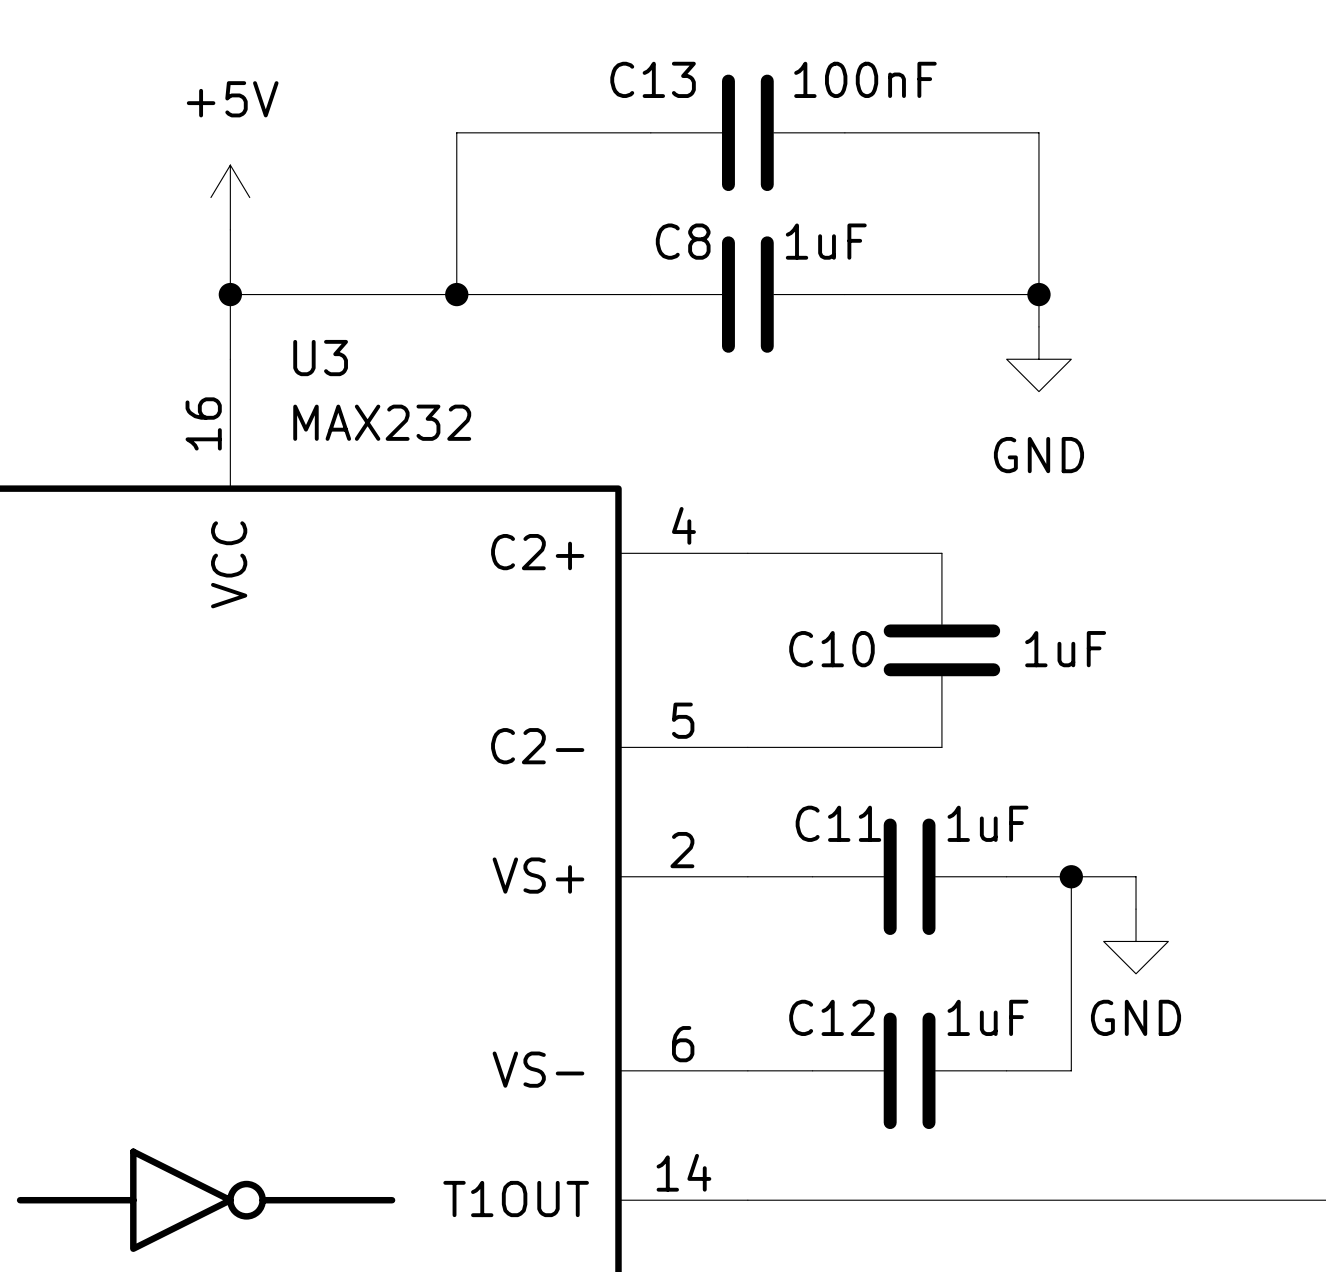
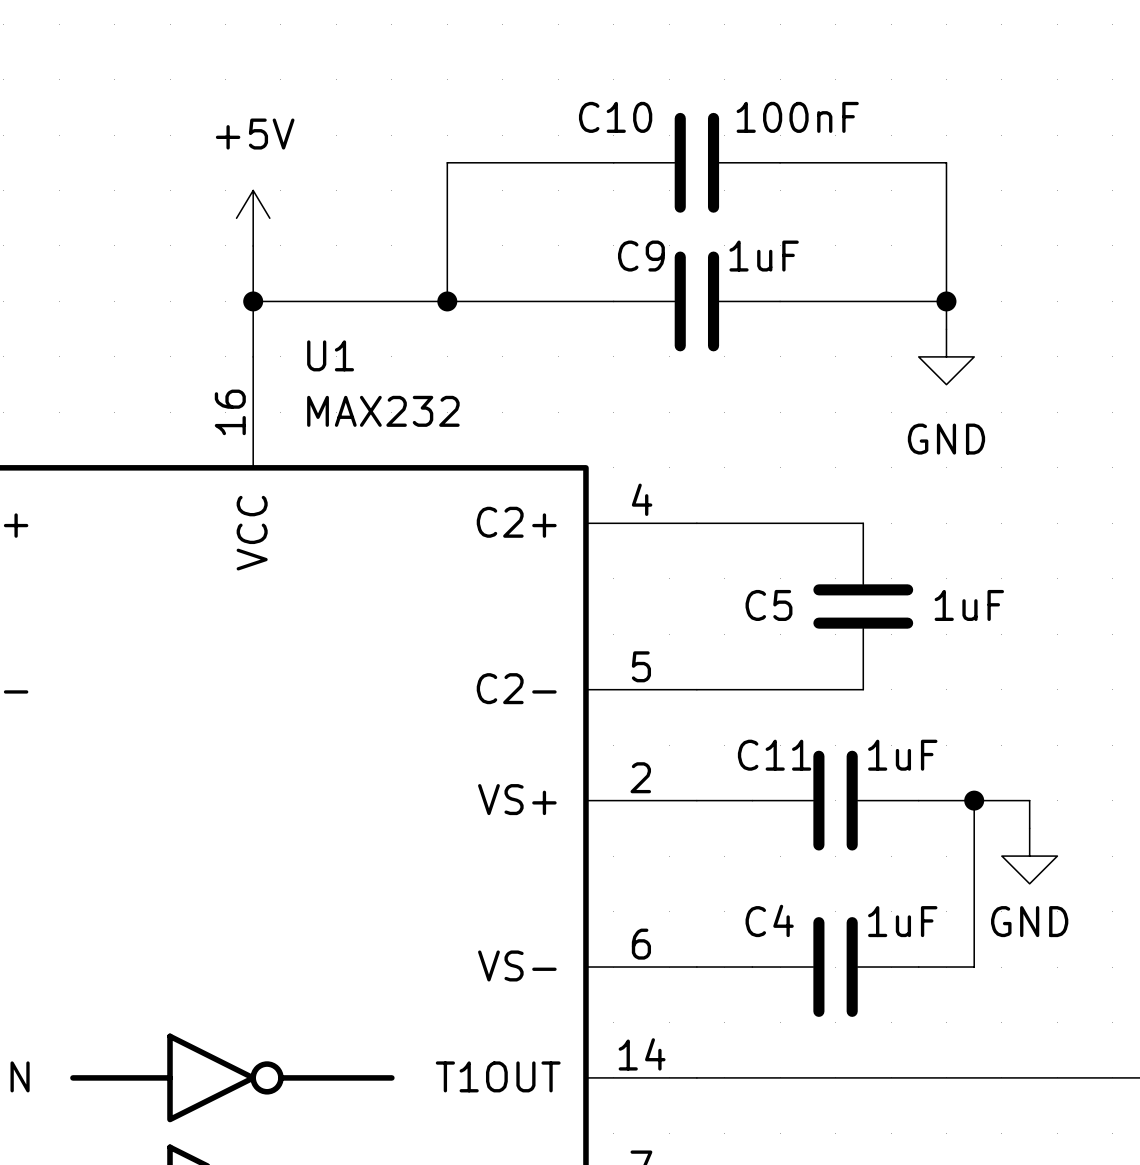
C13 name: C13 (653, 79) -> C10 (615, 117)
C8 name: C8 (683, 241) -> C9 (641, 256)
U3 name: U3 (320, 358) -> U1 (330, 355)
C10 name: C10 (831, 649) -> C5 (768, 605)
C12 name: C12 (831, 1017) -> C4 (769, 920)

